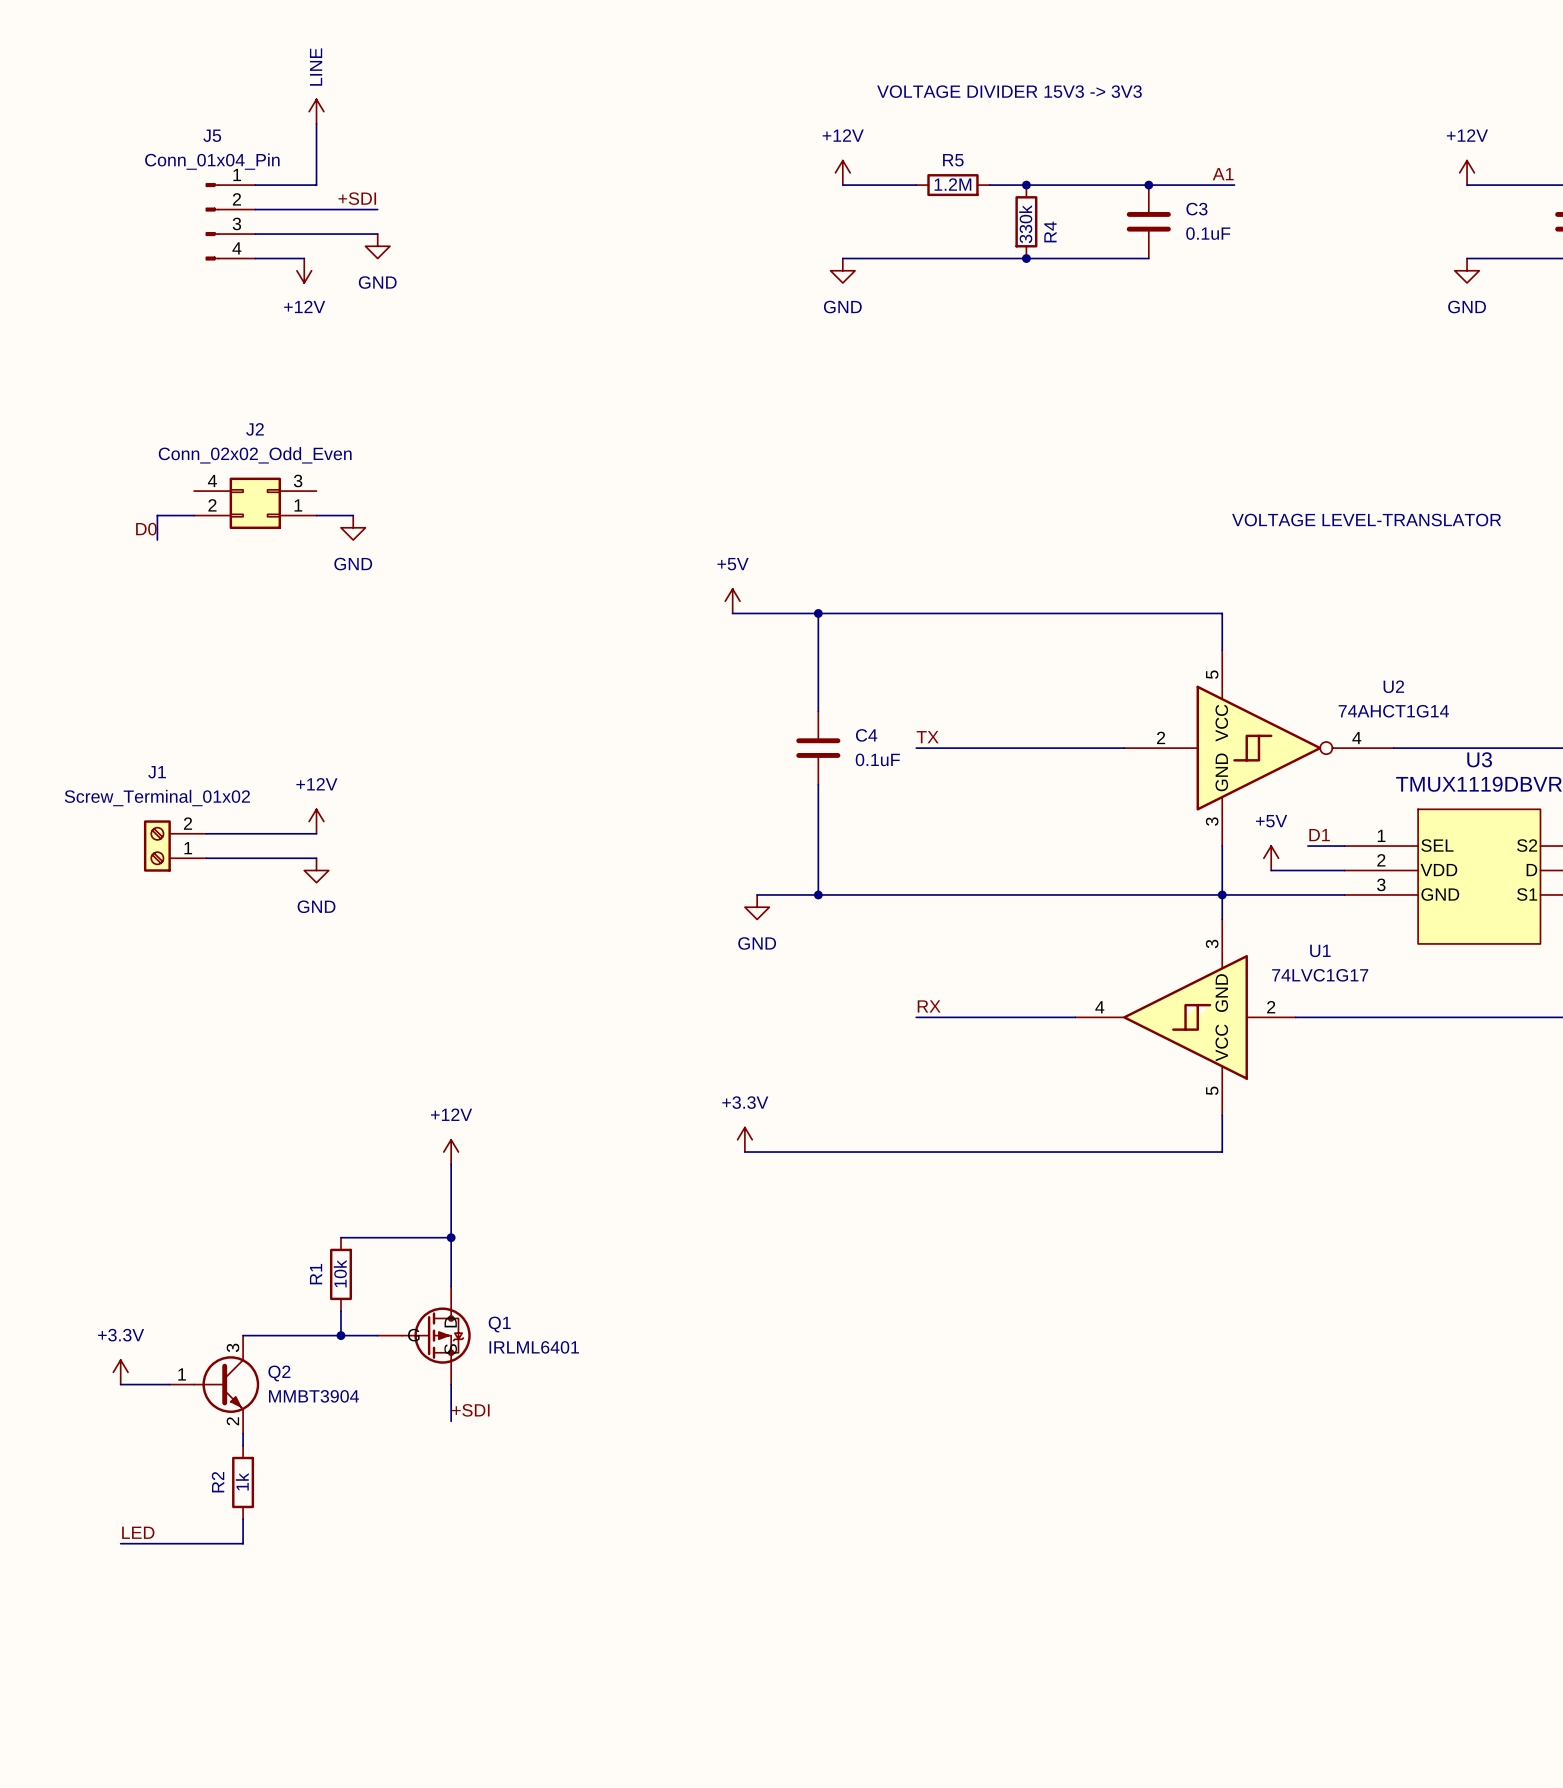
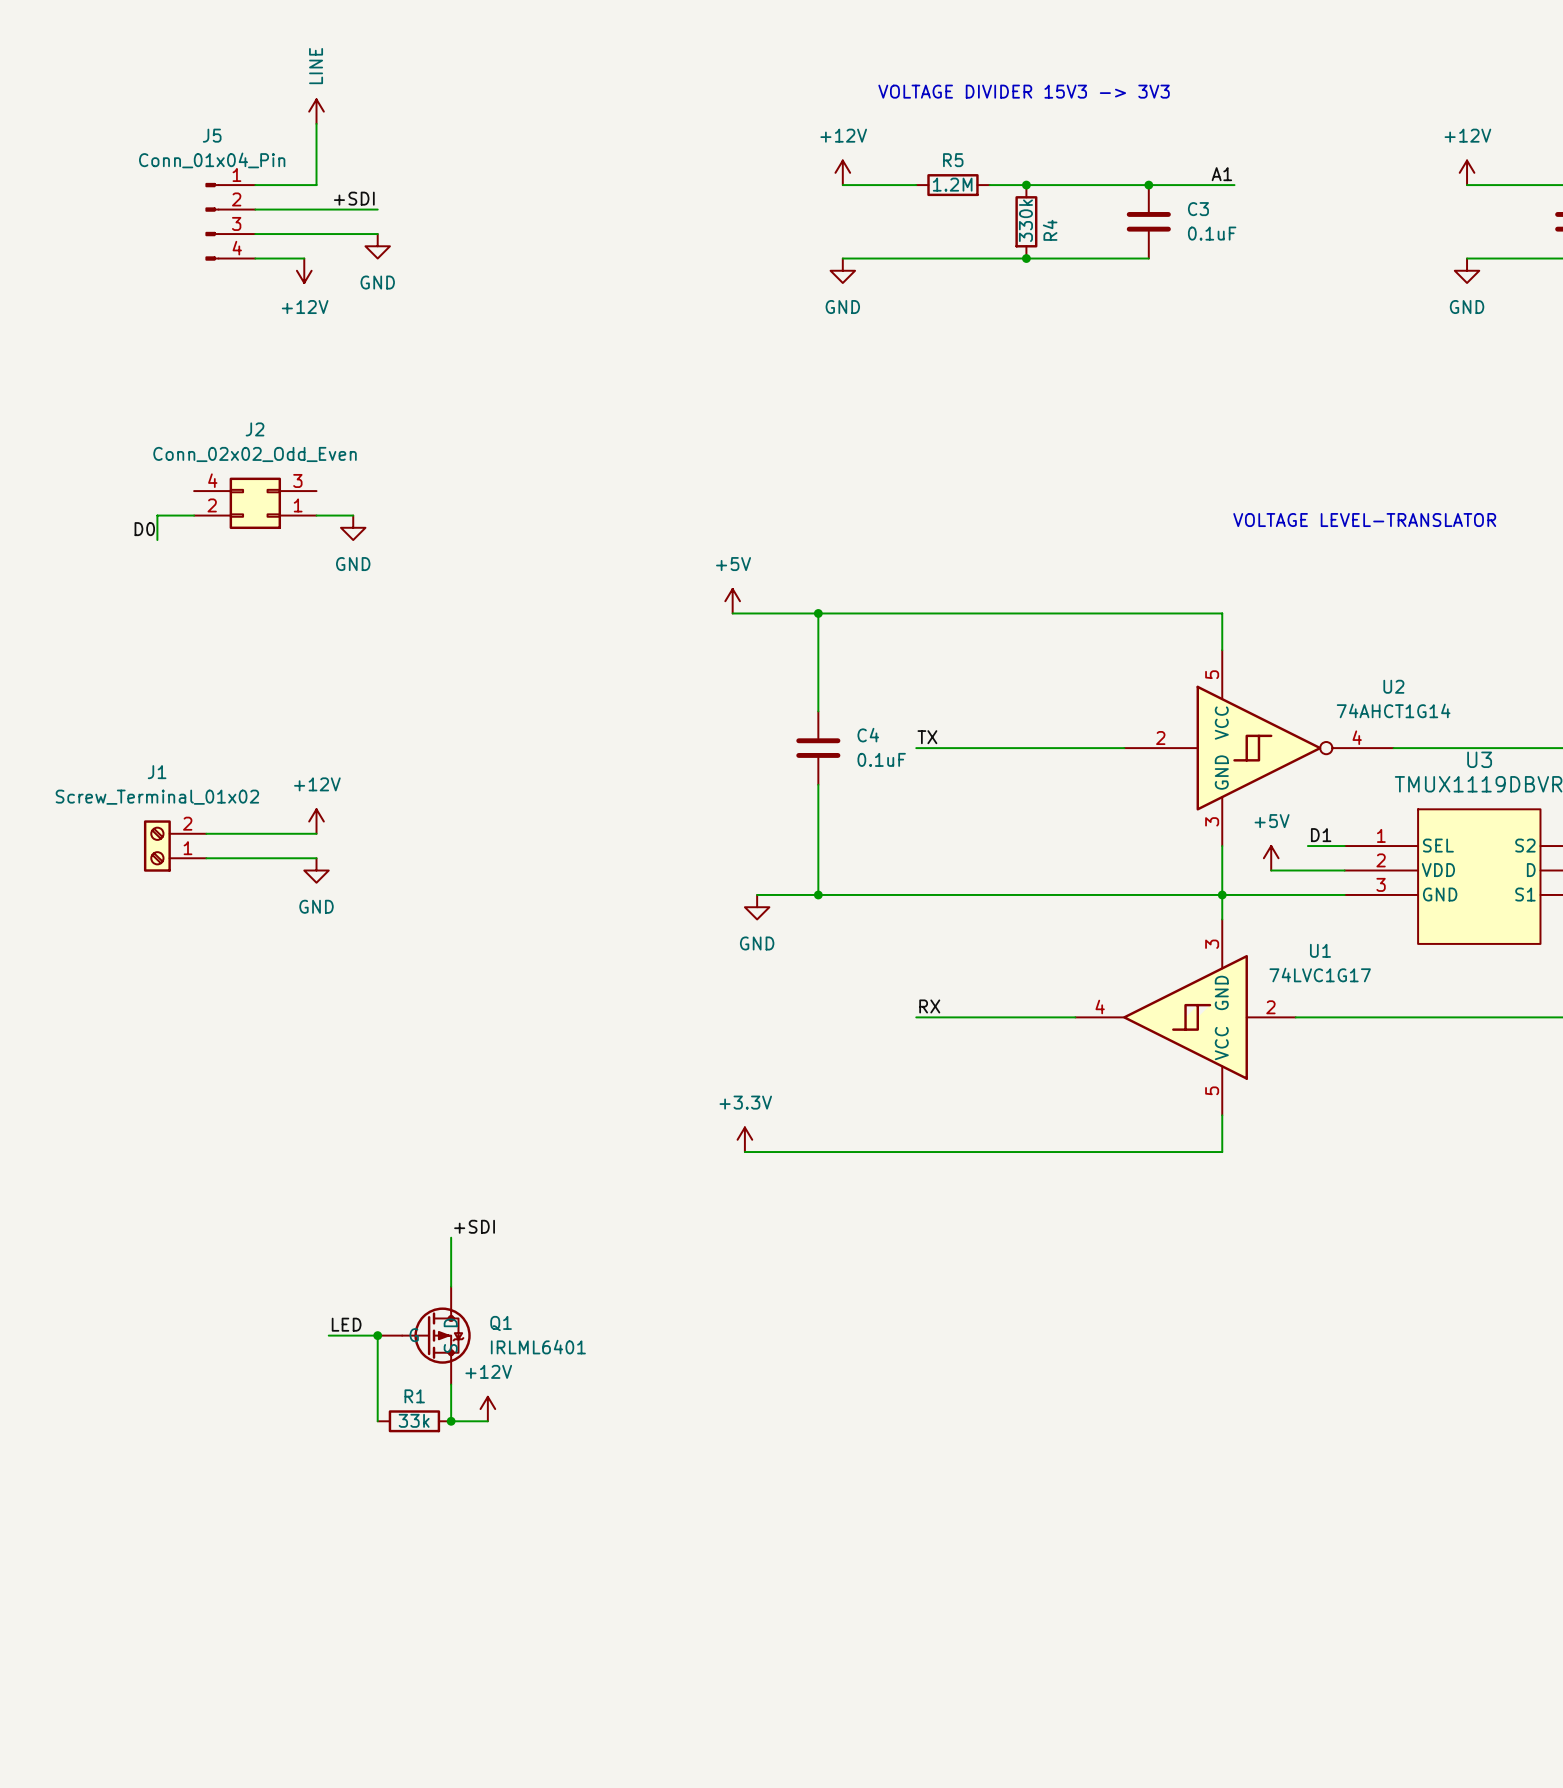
power symbol: +12V (451, 1152) -> none
wire: (451, 1164) (451, 1237) (340, 1237) -> none
junction: (451, 1237) -> none
R1 value: 10k (340, 1273) -> 33k (414, 1420)
R1 rotation: 0° (340, 1274) -> 90° clockwise (414, 1421)
R1 position: (340, 1274) -> (414, 1421)
label: none -> LED (346, 1324)
wire: (243, 1335) (328, 1335) -> none
junction position: (340, 1335) -> (377, 1335)
wire: none -> (377, 1335) (377, 1421)
power symbol: +3.3V (120, 1372) -> none
wire: (120, 1384) (169, 1384) -> none
Q2: MMBT3904 (214, 1384) -> none
power symbol: none -> +12V (487, 1409)
label position: +SDI (470, 1410) -> +SDI (474, 1226)
wire: none -> (451, 1421) (487, 1421)
junction: none -> (451, 1421)
wire: (243, 1433) (243, 1445) -> none
R2: 1k (243, 1482) -> none
wire: (243, 1519) (243, 1543) (120, 1543) -> none
label: LED (138, 1532) -> none

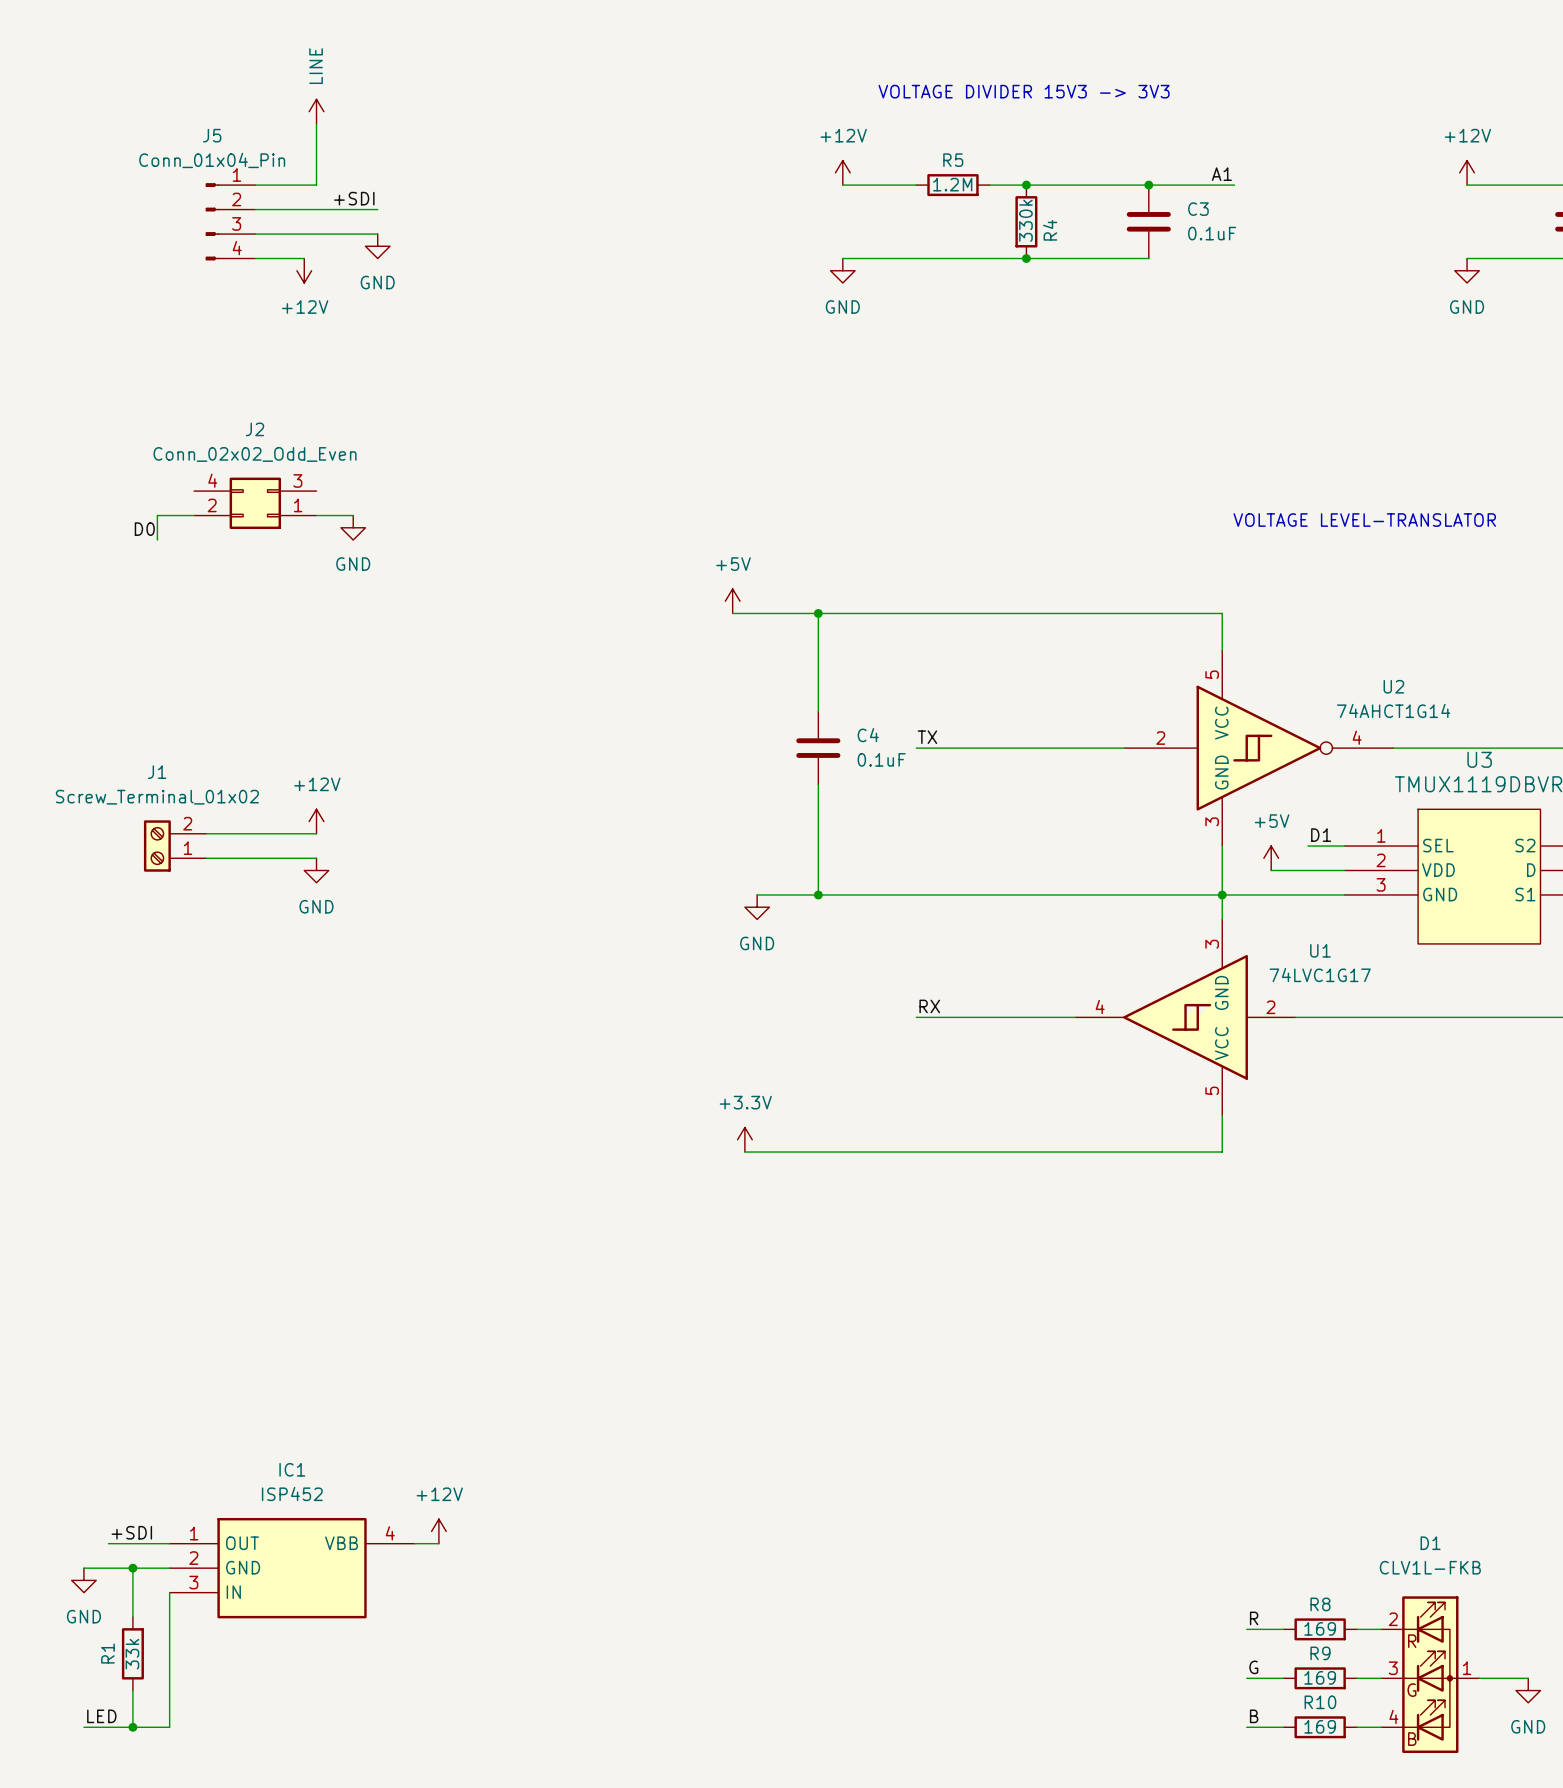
label: +SDI (474, 1226) -> none
wire: (451, 1237) (451, 1286) -> none
label: LED (346, 1324) -> none
wire: (328, 1335) (377, 1335) (377, 1421) -> none
junction: (377, 1335) -> none
Q1: IRLML6401 (424, 1335) -> none
wire: (451, 1384) (451, 1421) (487, 1421) -> none
R1 name position: R1 (414, 1396) -> R1 (107, 1653)
power symbol position: +12V (487, 1409) -> +12V (438, 1531)
R1 rotation: 0° (414, 1421) -> 90° clockwise (132, 1653)
R1 position: (414, 1421) -> (132, 1653)
junction: (451, 1421) -> none
label: none -> +SDI (131, 1532)
wire: none -> (108, 1543) (169, 1543)
wire: none -> (414, 1543) (438, 1543)
wire: none -> (83, 1568) (169, 1568)
wire: none -> (132, 1568) (132, 1617)
junction: none -> (132, 1568)
IC1: none -> ISP452 (292, 1568)
power symbol: none -> GND (83, 1580)
wire: none -> (169, 1592) (169, 1727) (83, 1727)
label: none -> R (1254, 1618)
wire: none -> (1246, 1629) (1283, 1629)
R8: none -> 169 (1320, 1629)
wire: none -> (1356, 1629) (1381, 1629)
label: none -> G (1253, 1667)
D1: none -> CLV1L-FKB (1430, 1674)
wire: none -> (1246, 1678) (1283, 1678)
R9: none -> 169 (1320, 1678)
wire: none -> (1356, 1678) (1381, 1678)
wire: none -> (1479, 1678) (1528, 1678)
wire: none -> (132, 1690) (132, 1727)
power symbol: none -> GND (1528, 1690)
label: none -> LED (101, 1716)
label: none -> B (1254, 1716)
junction: none -> (132, 1727)
wire: none -> (1246, 1727) (1283, 1727)
R10: none -> 169 (1320, 1727)
wire: none -> (1356, 1727) (1381, 1727)

